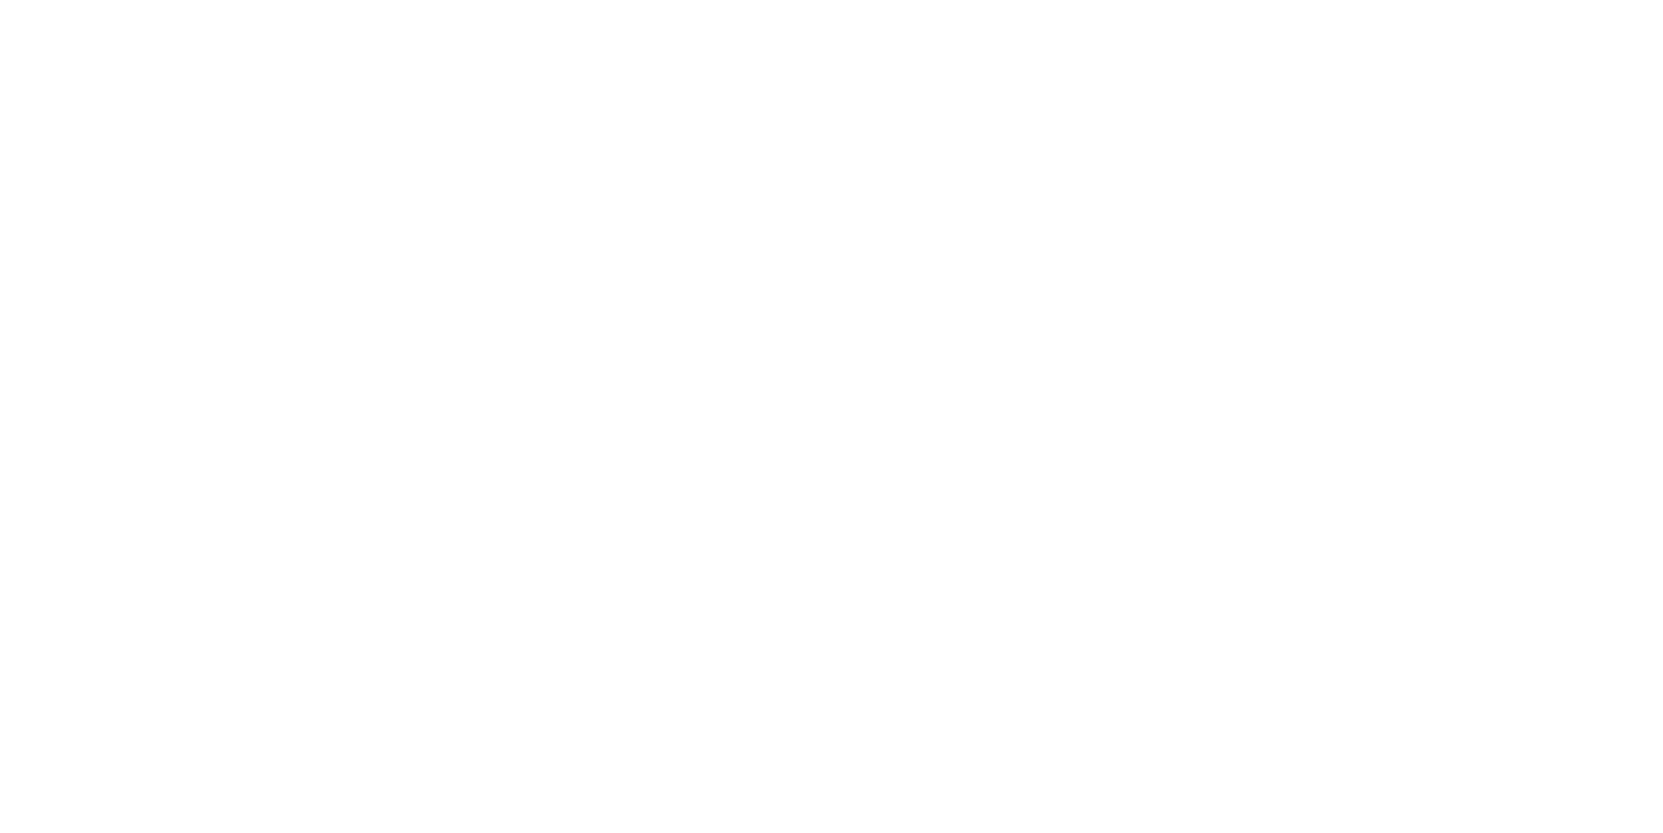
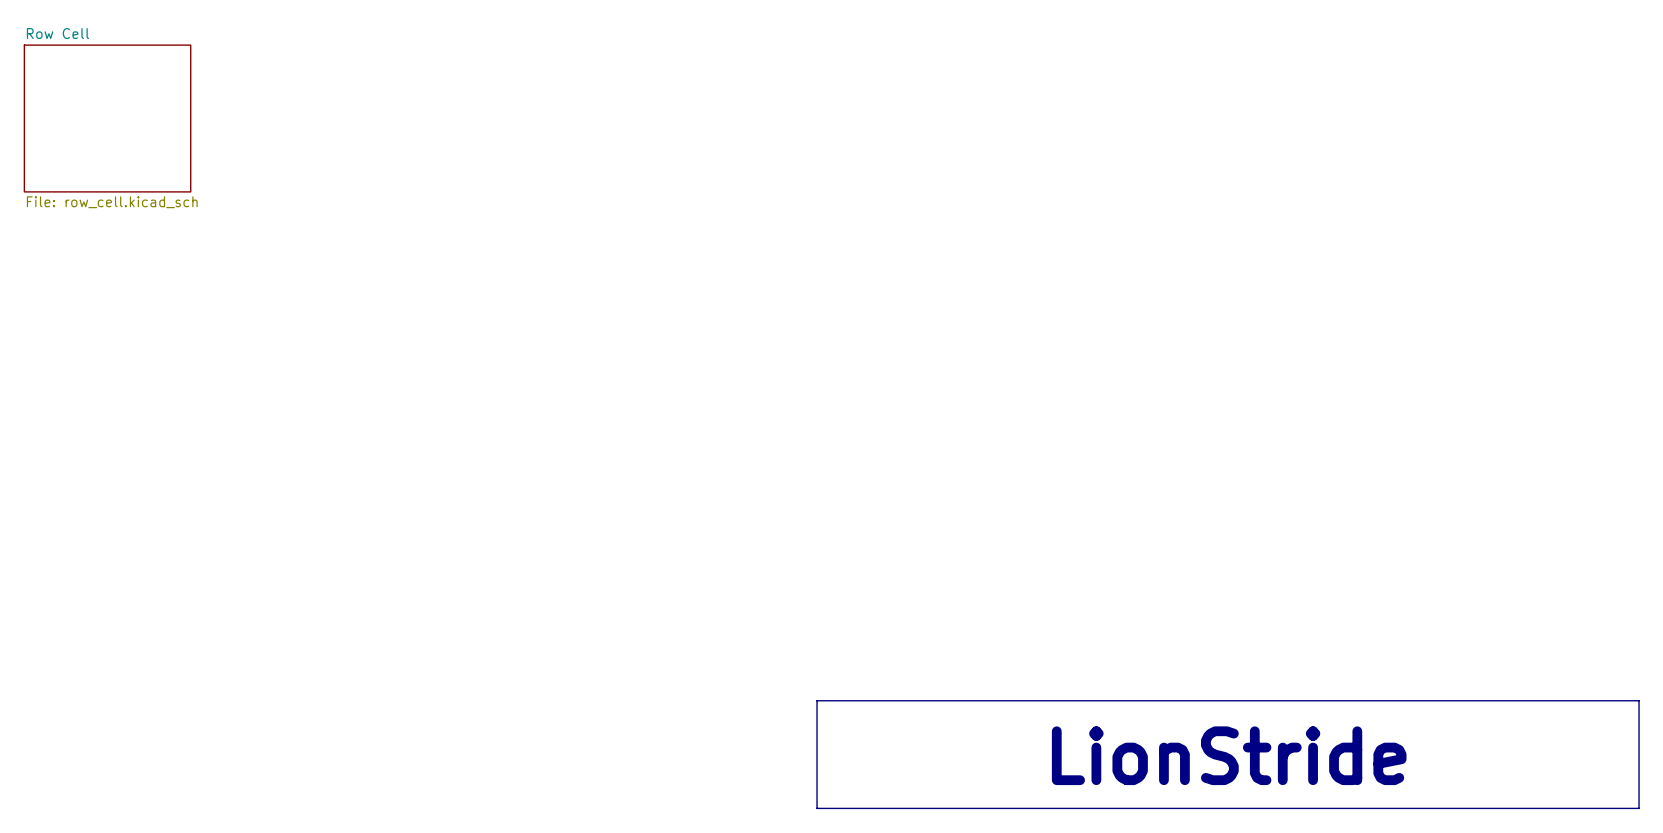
sheet Row Cell: none -> File: row_cell.kicad_sch (107, 118)
line: none -> (817, 700) (1639, 700) (1639, 808) (817, 808) (817, 700)
text: none -> LionStride (1229, 755)

